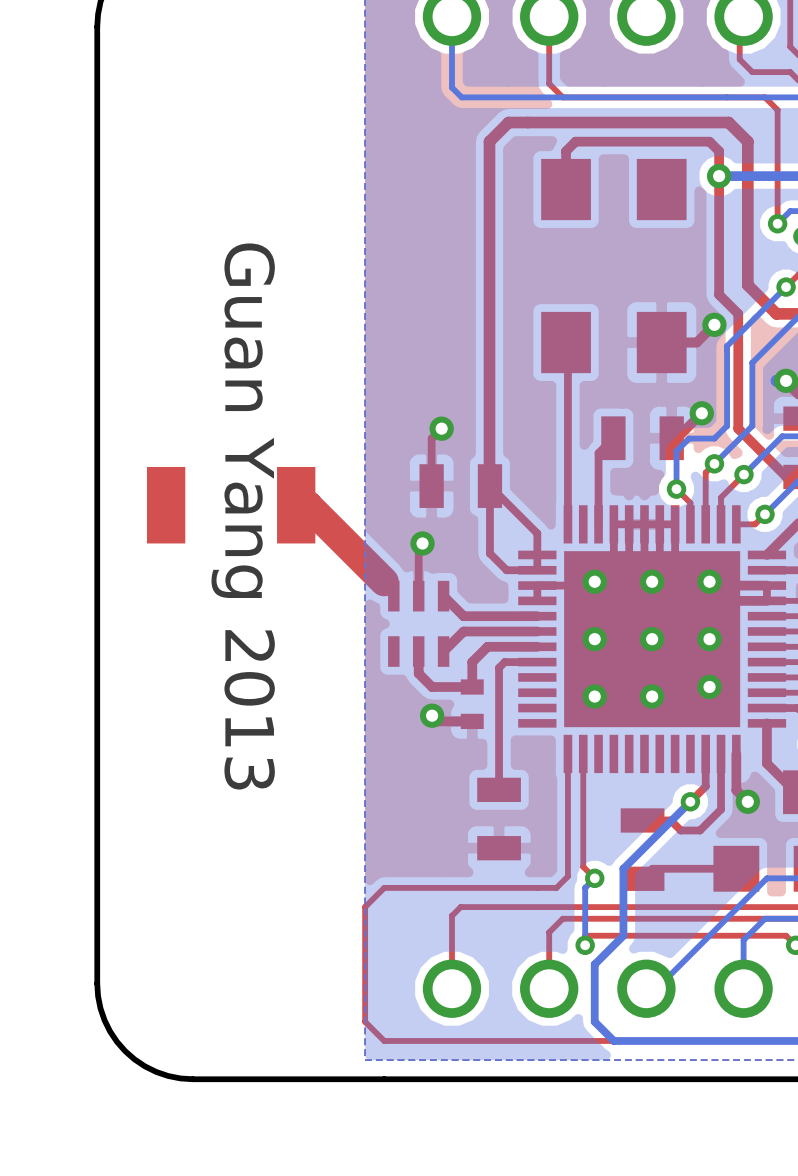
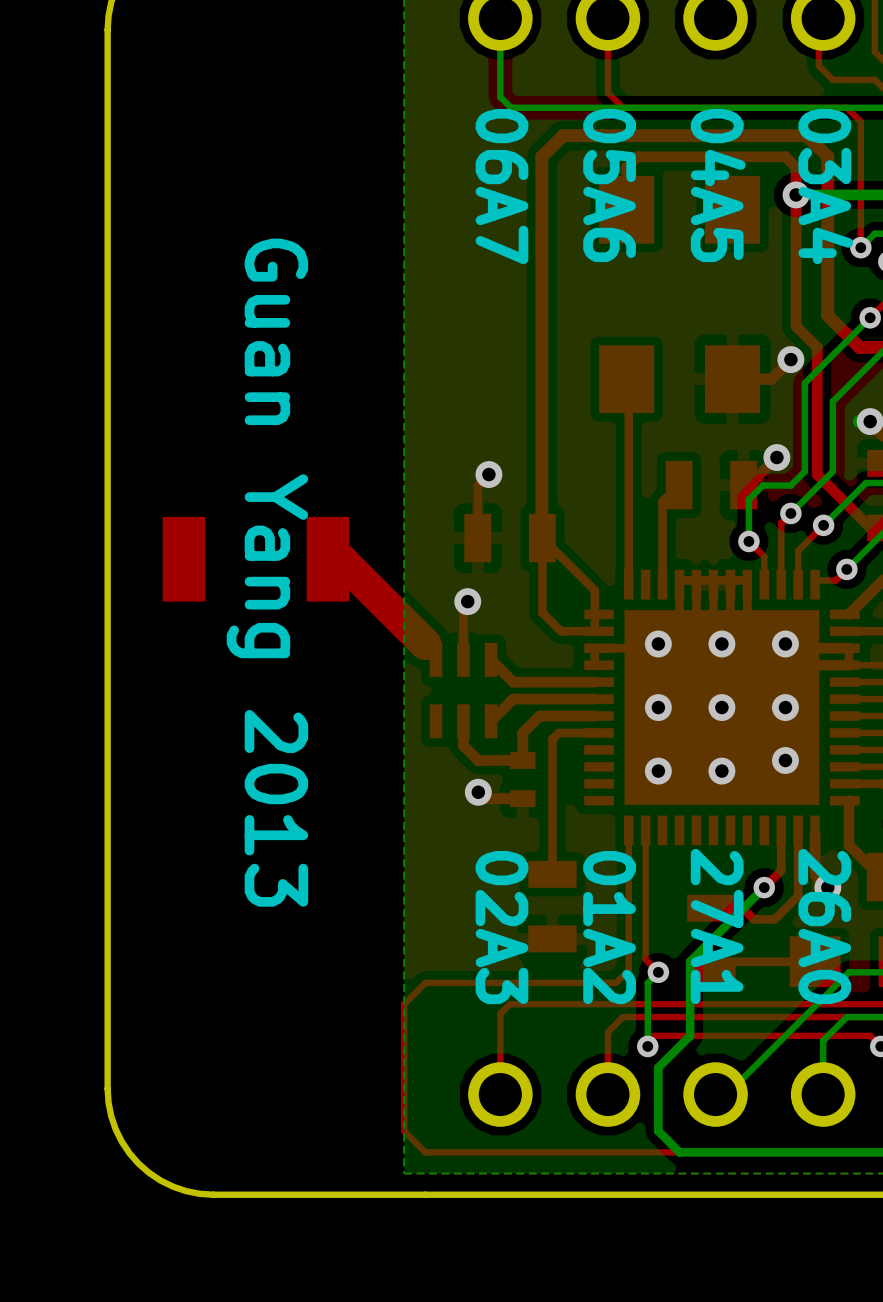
text: none -> 06A7 (501, 186)
text: none -> 05A6 (609, 185)
text: none -> 04A5 (718, 185)
text: none -> 03A4 (825, 186)
part footprint: [518, 505, 787, 774] -> [584, 569, 860, 846]
text: none -> 01A2 (609, 927)
text: none -> 02A3 (501, 927)
text: none -> 27A1 (717, 926)
text: none -> 26A0 (824, 926)

